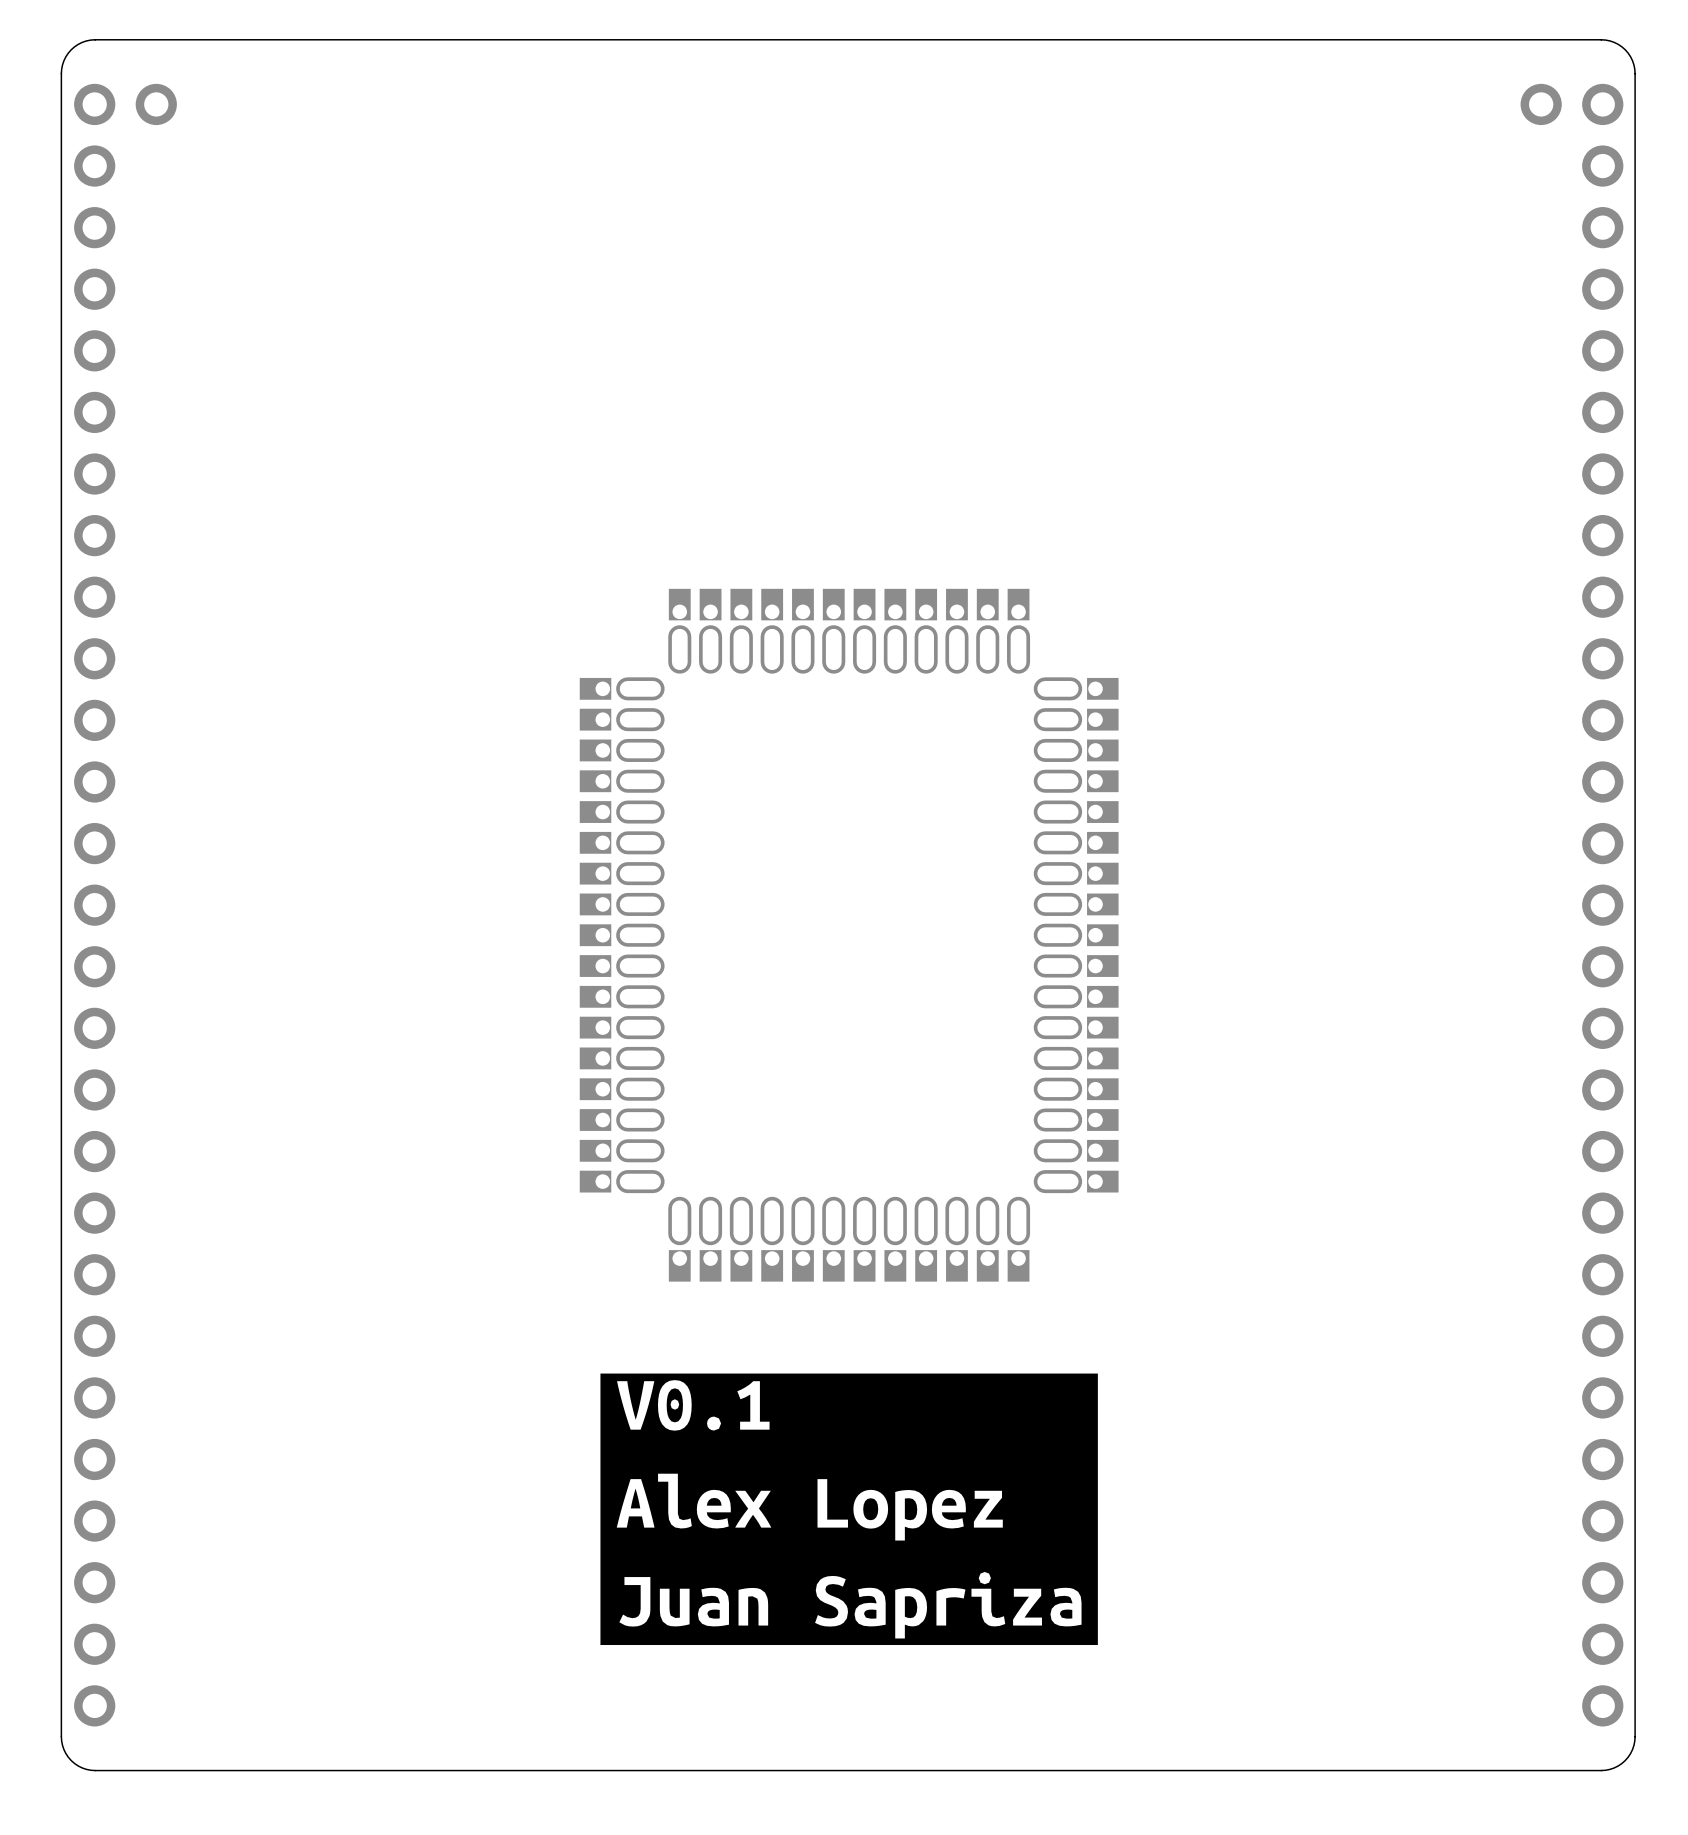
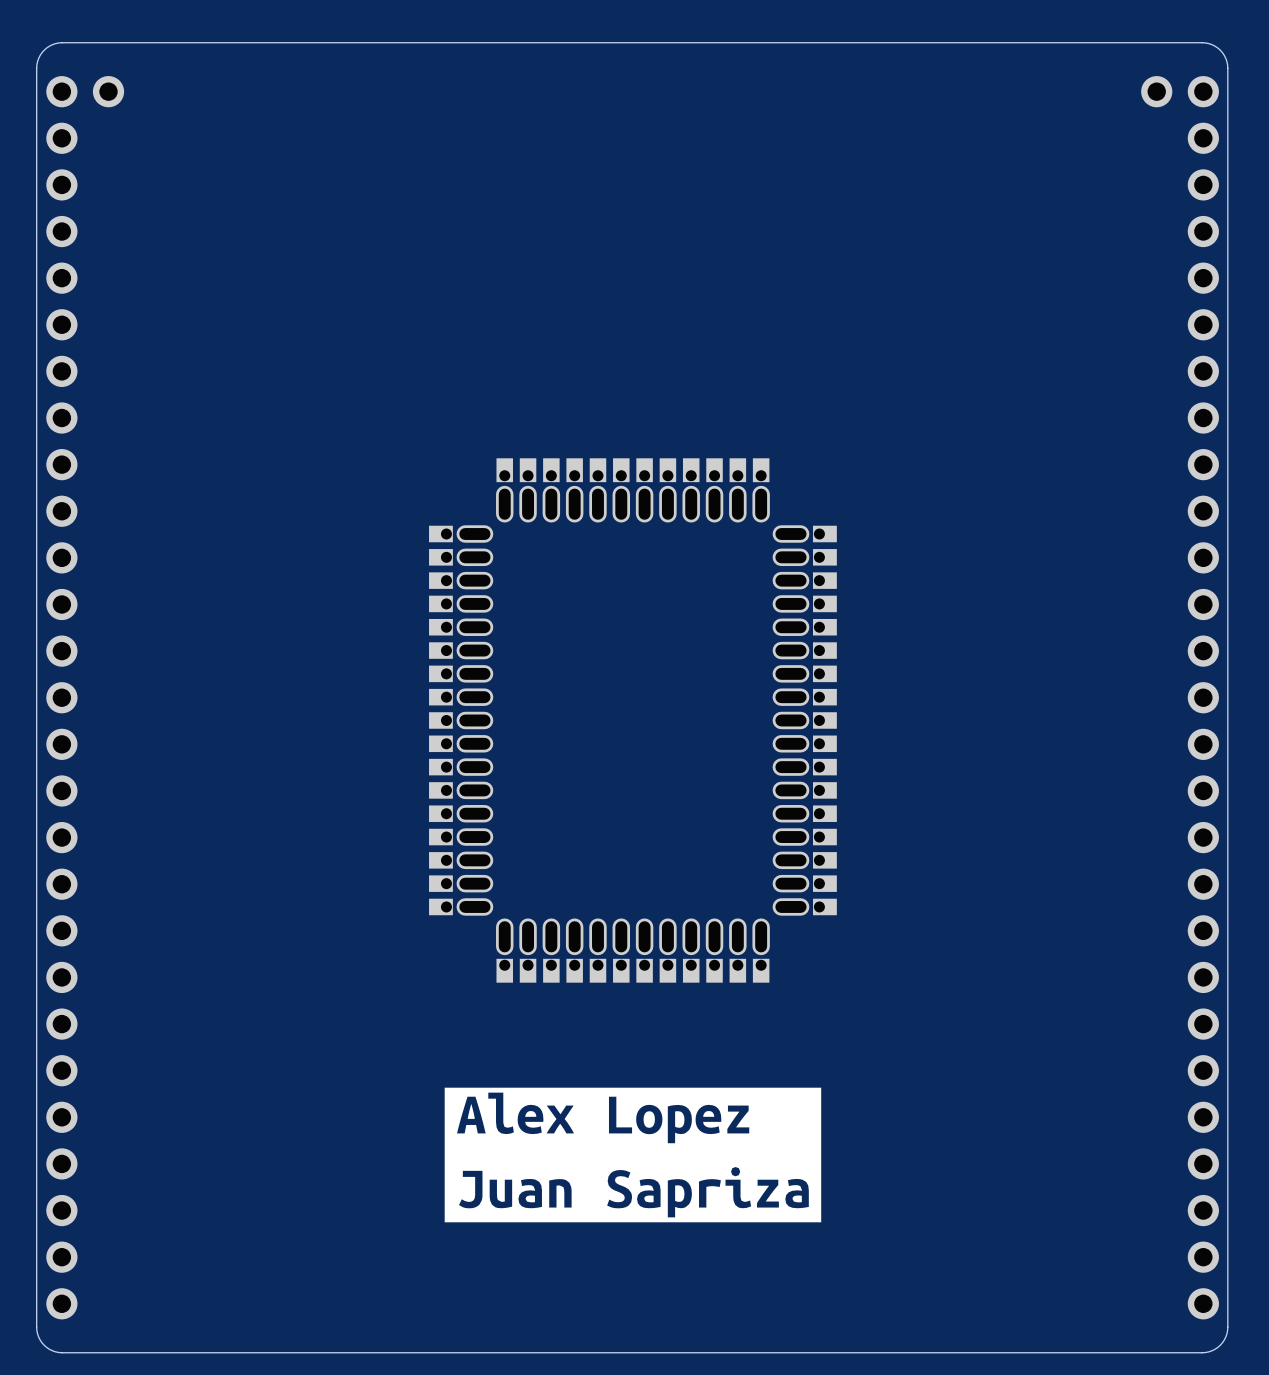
drawing shape: [600, 1373, 1098, 1646] -> [444, 1087, 822, 1223]

